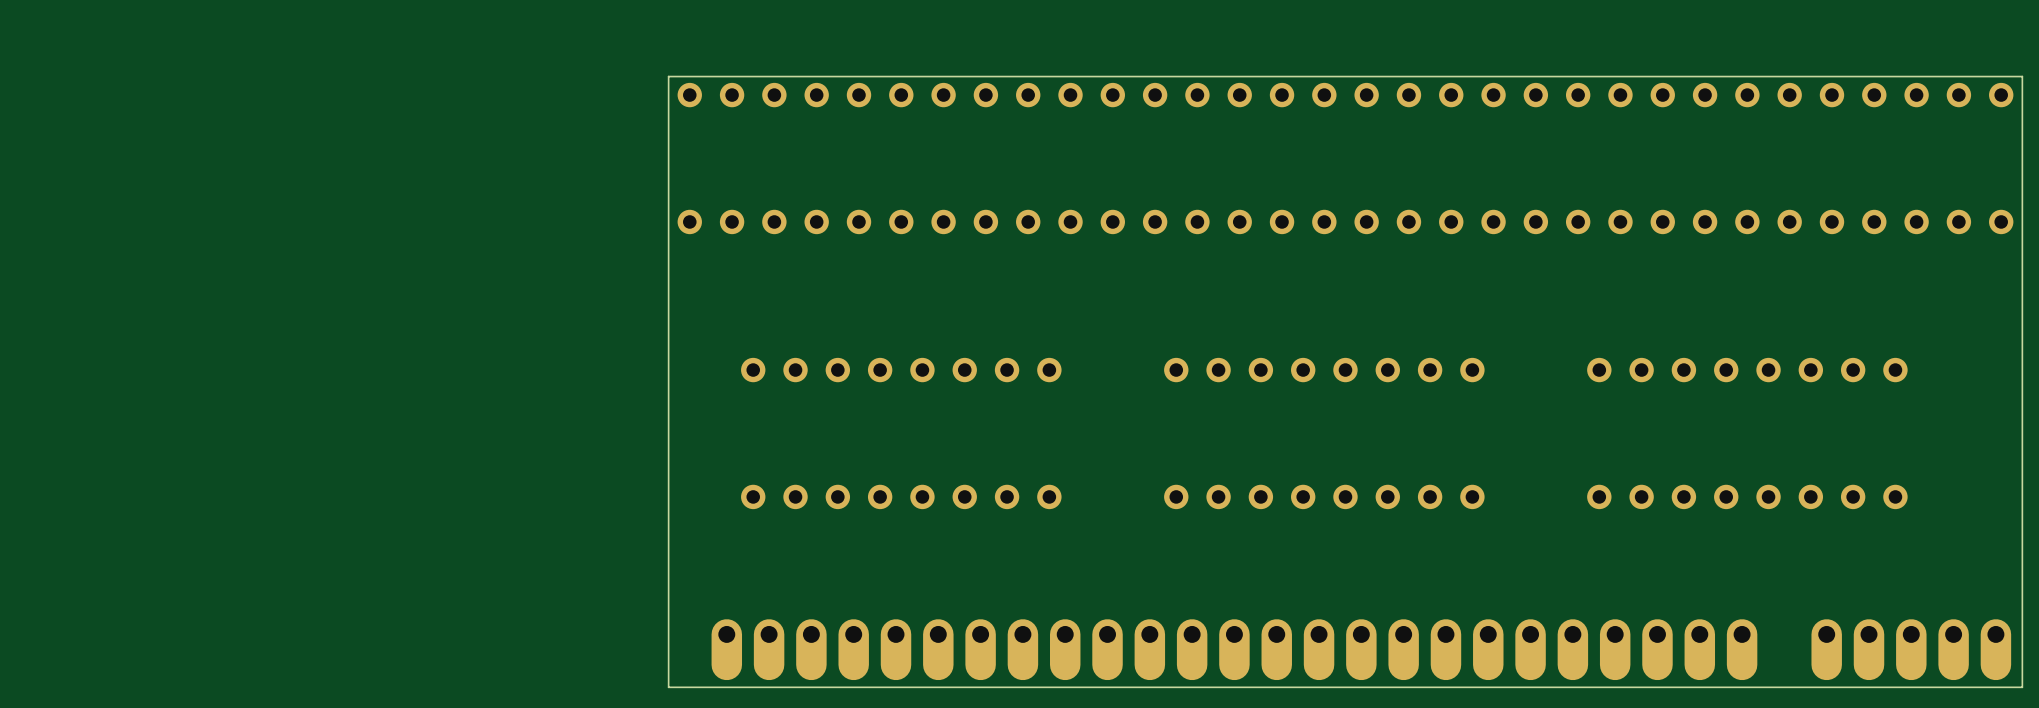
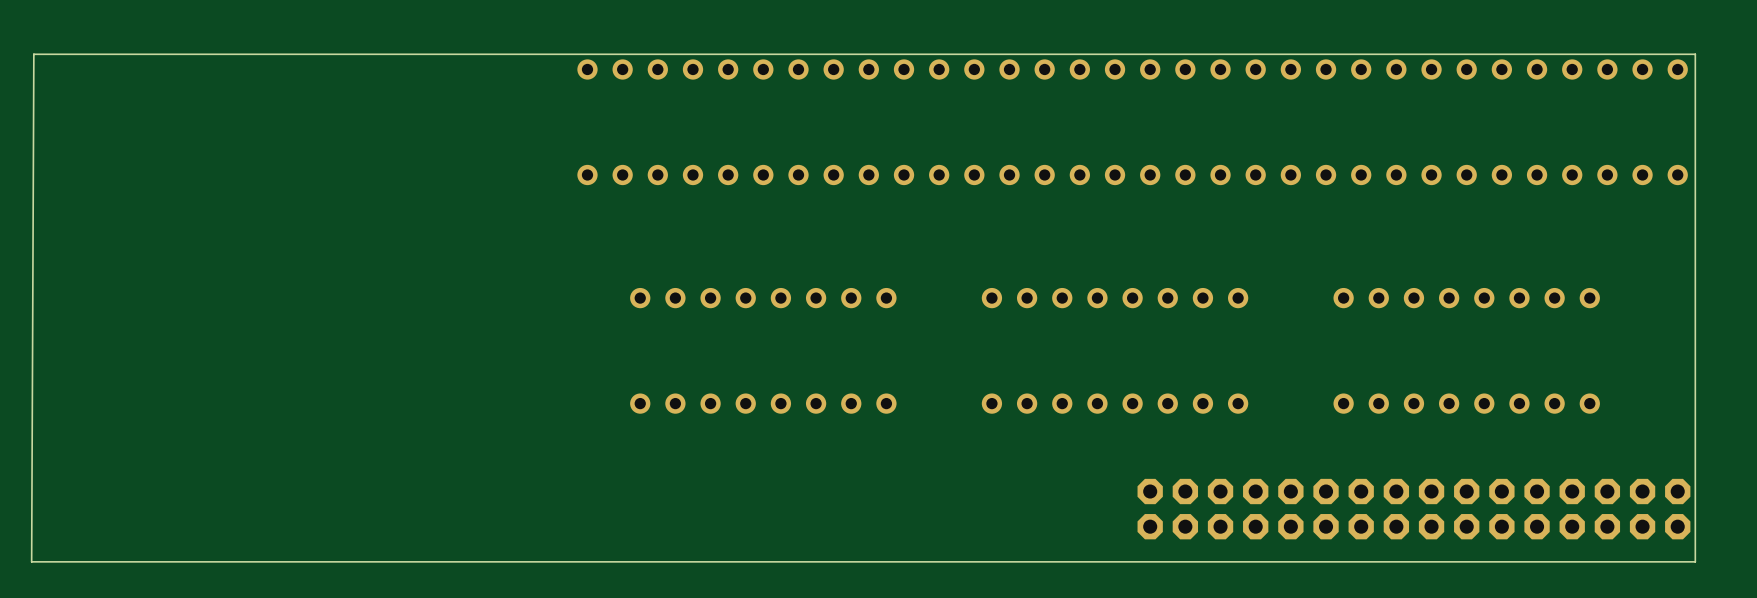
board edge: (2022, 76) (668, 76) (668, 687) -> (1695, 54) (33, 54) (31, 561) (569, 561)
part: none -> (1413, 509)
part: (726, 649) -> none
part: (769, 649) -> none
part: (811, 649) -> none
part: (853, 649) -> none
part: (896, 649) -> none
part: (938, 649) -> none
part: (980, 649) -> none
part: (1022, 649) -> none
part: (1065, 649) -> none
part: (1107, 649) -> none
part: (1149, 649) -> none
part: (1192, 649) -> none
part: (1234, 649) -> none
part: (1276, 649) -> none
part: (1319, 649) -> none
part: (1361, 649) -> none
part: (1403, 649) -> none
part: (1445, 649) -> none
part: (1488, 649) -> none
part: (1530, 649) -> none
part: (1572, 649) -> none
part: (1615, 649) -> none
part: (1657, 649) -> none
part: (1699, 649) -> none
part: (1742, 649) -> none
part: (1826, 649) -> none
part: (1869, 649) -> none
part: (1911, 649) -> none
part: (1953, 649) -> none
part: (1995, 649) -> none

